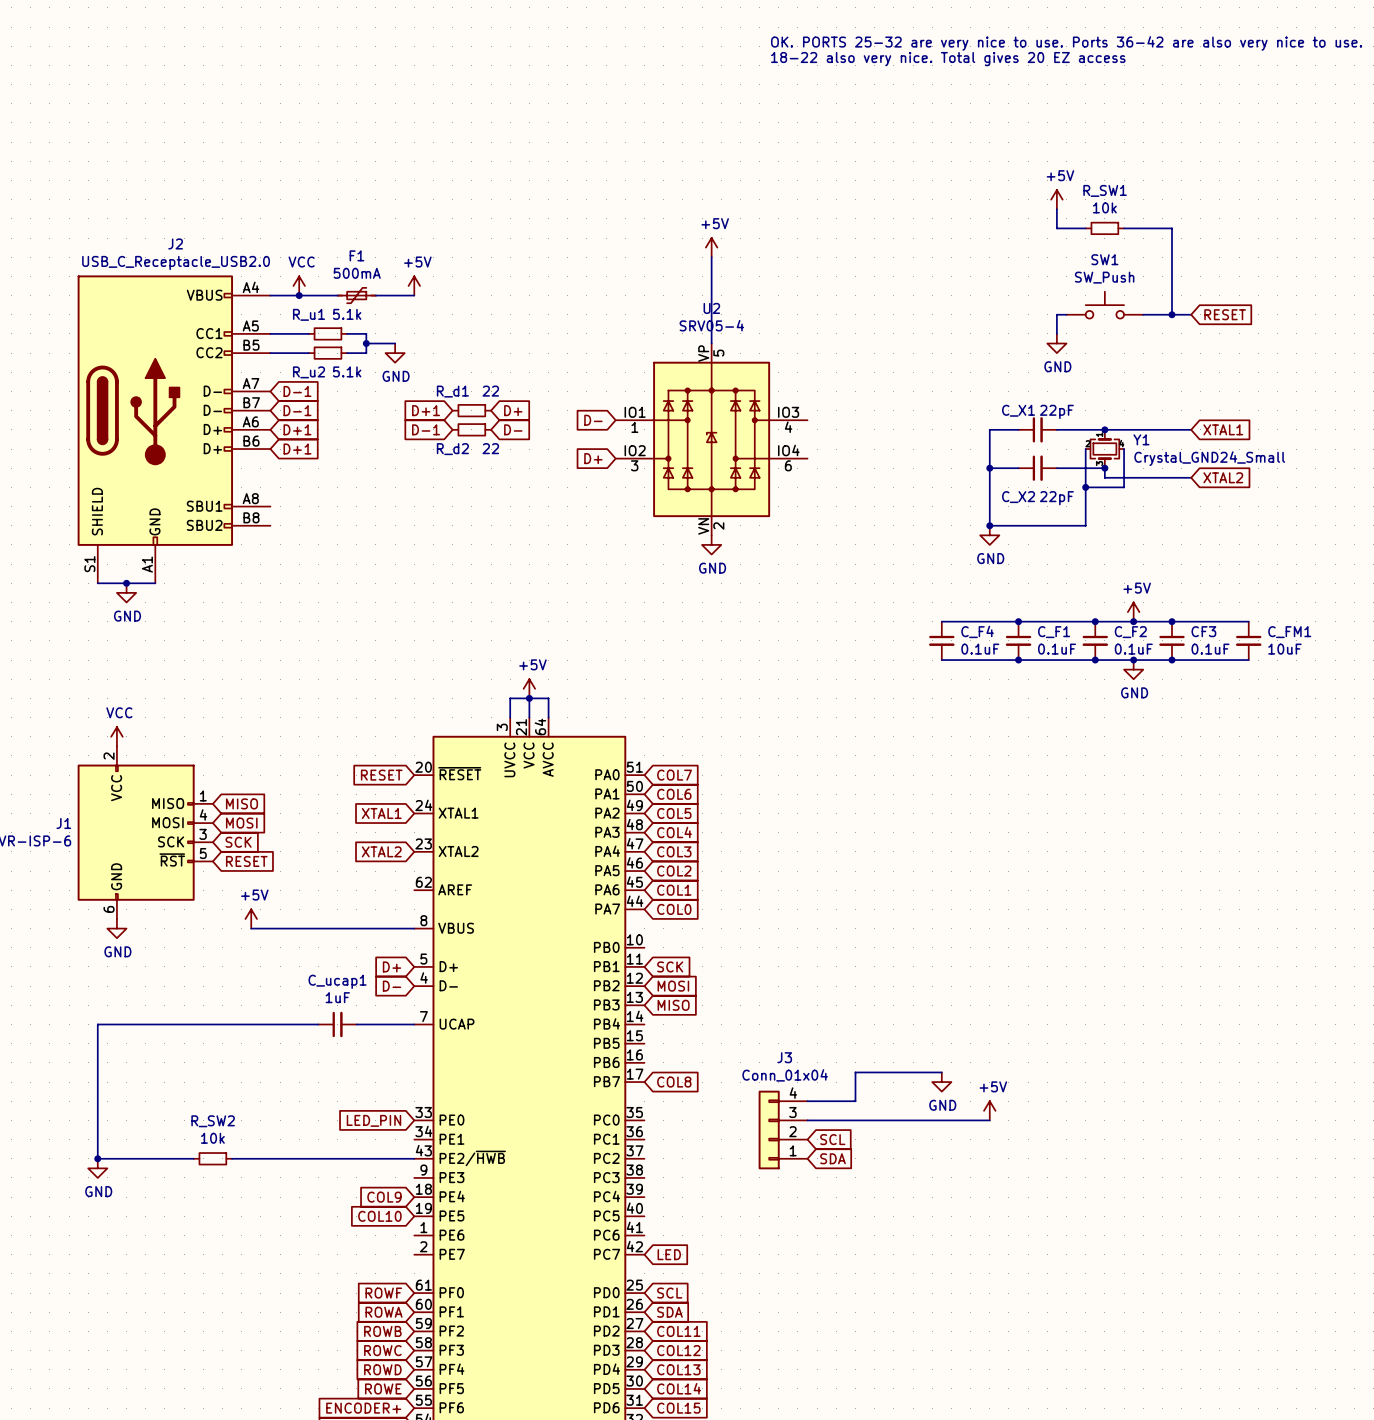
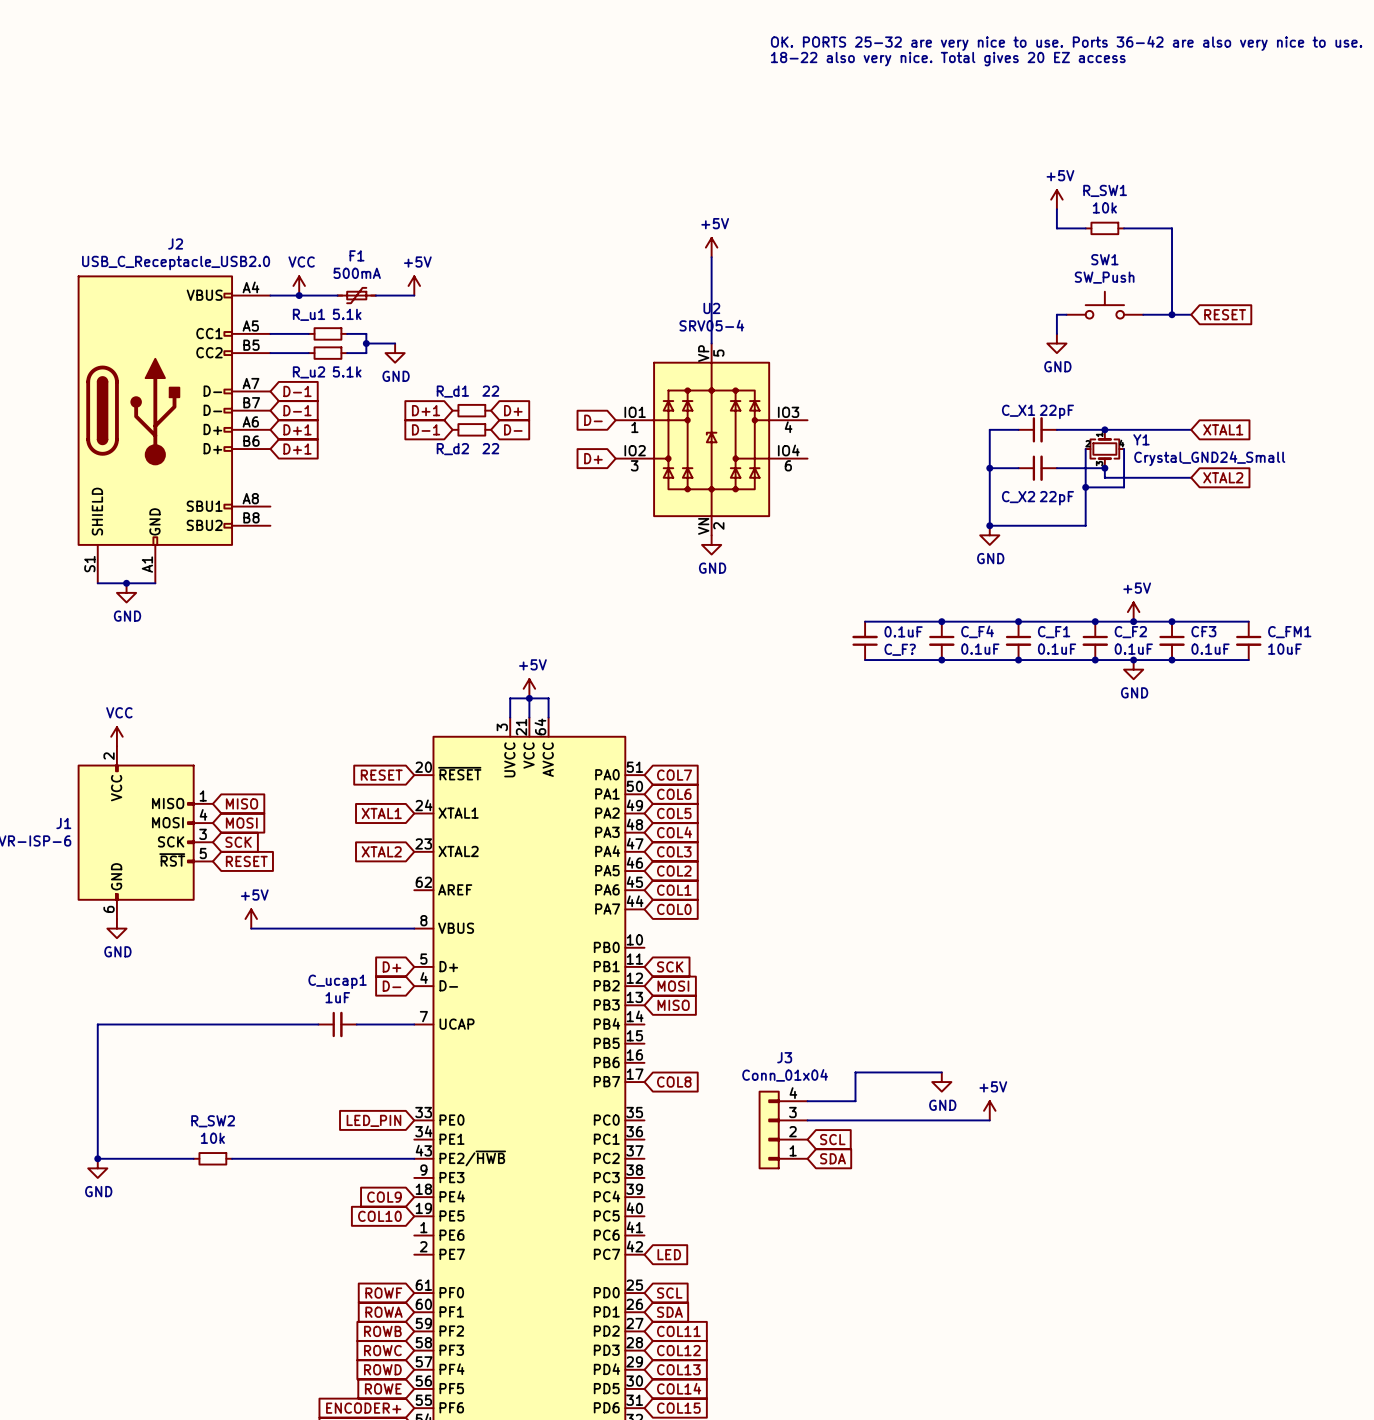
wire: none -> (865, 621) (941, 621)
junction: none -> (941, 621)
C_F?: none -> 0.1uF (865, 640)
wire: none -> (865, 660) (941, 660)
junction: none -> (941, 660)

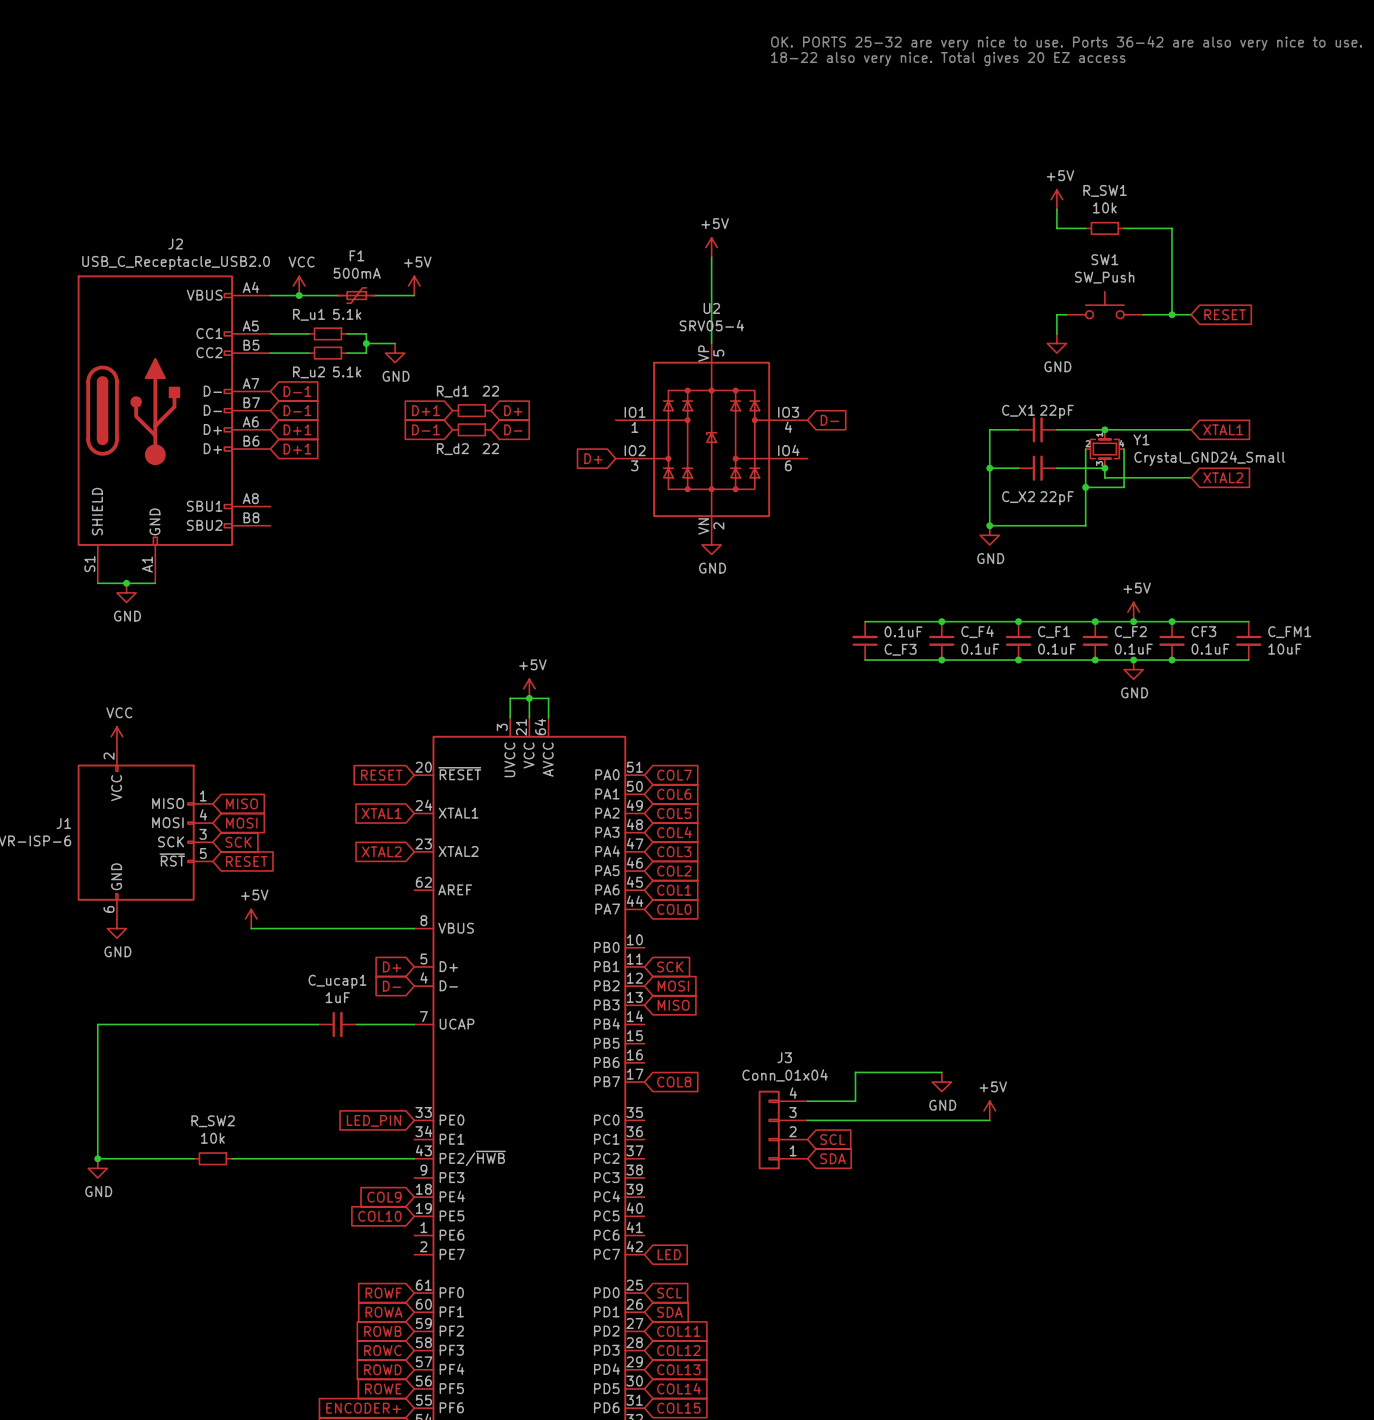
global label: D- (593, 420) -> none
global label: none -> D- (829, 420)
C_F? name: C_F? (900, 649) -> C_F3 (900, 649)

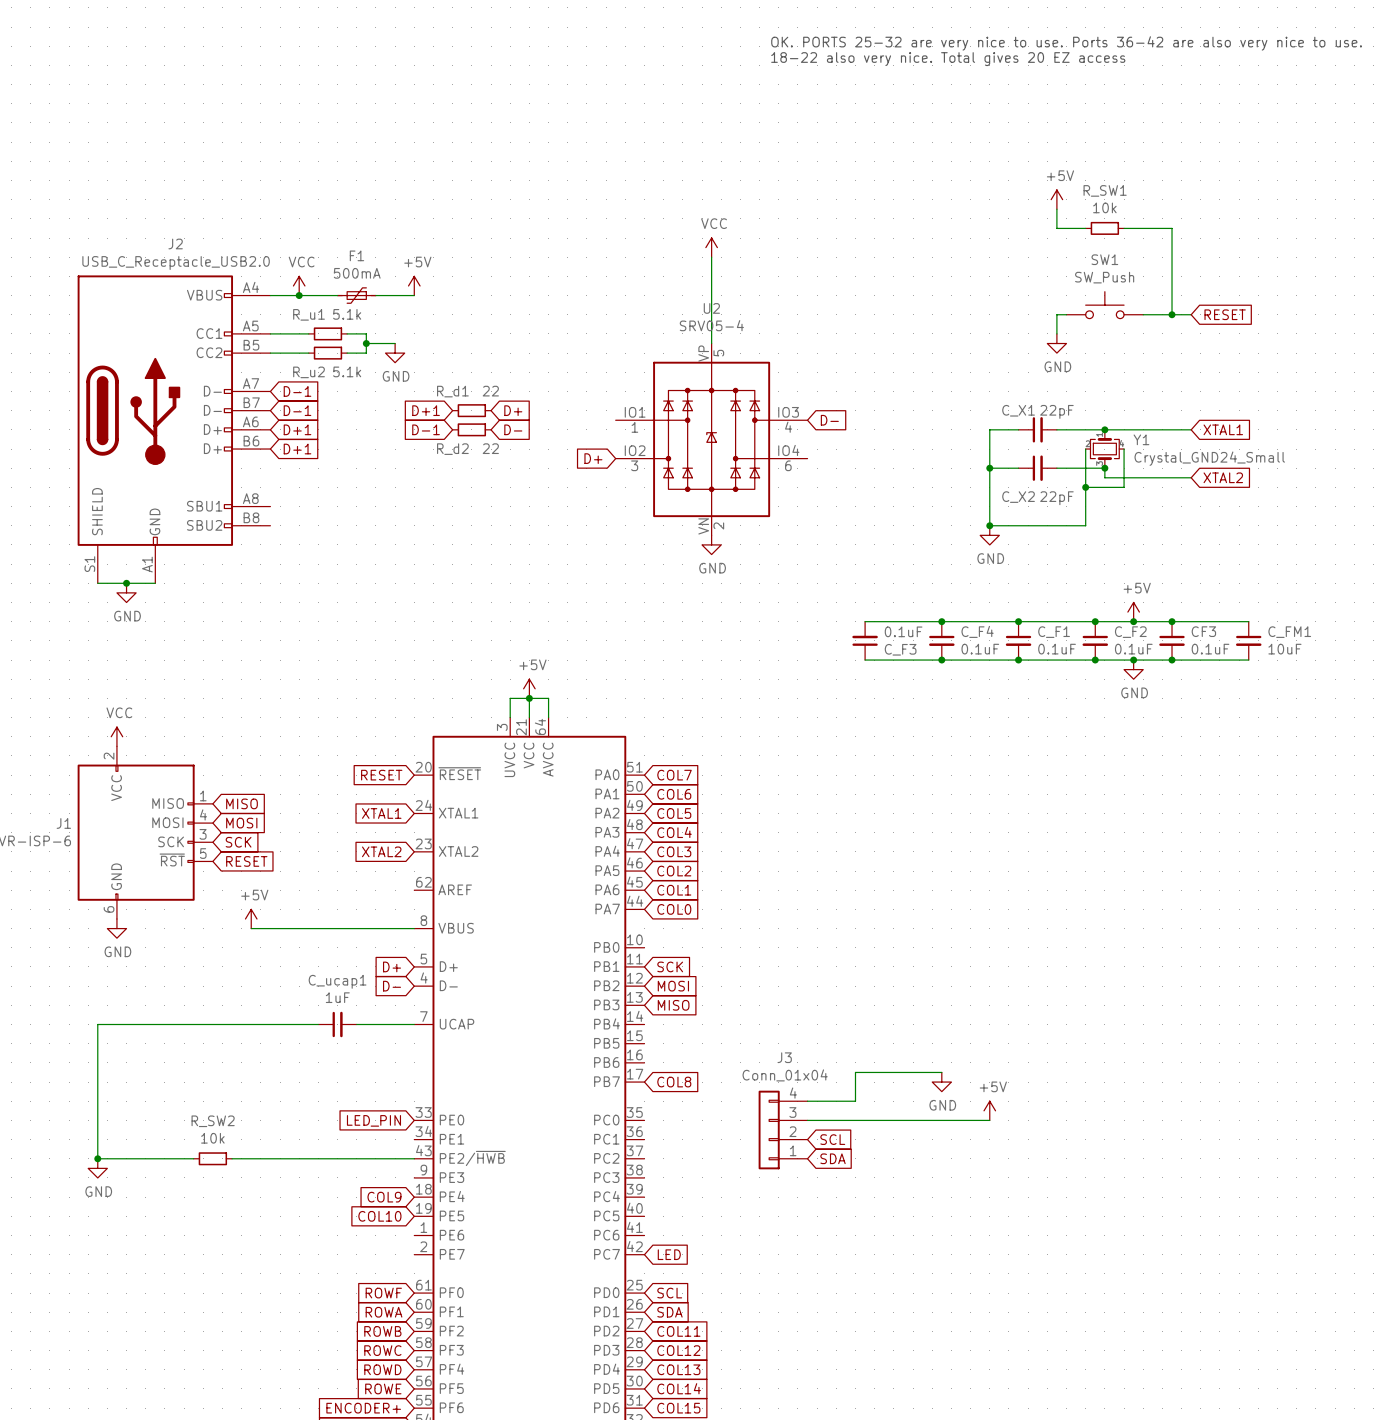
power symbol: +5V (711, 247) -> VCC (711, 247)

